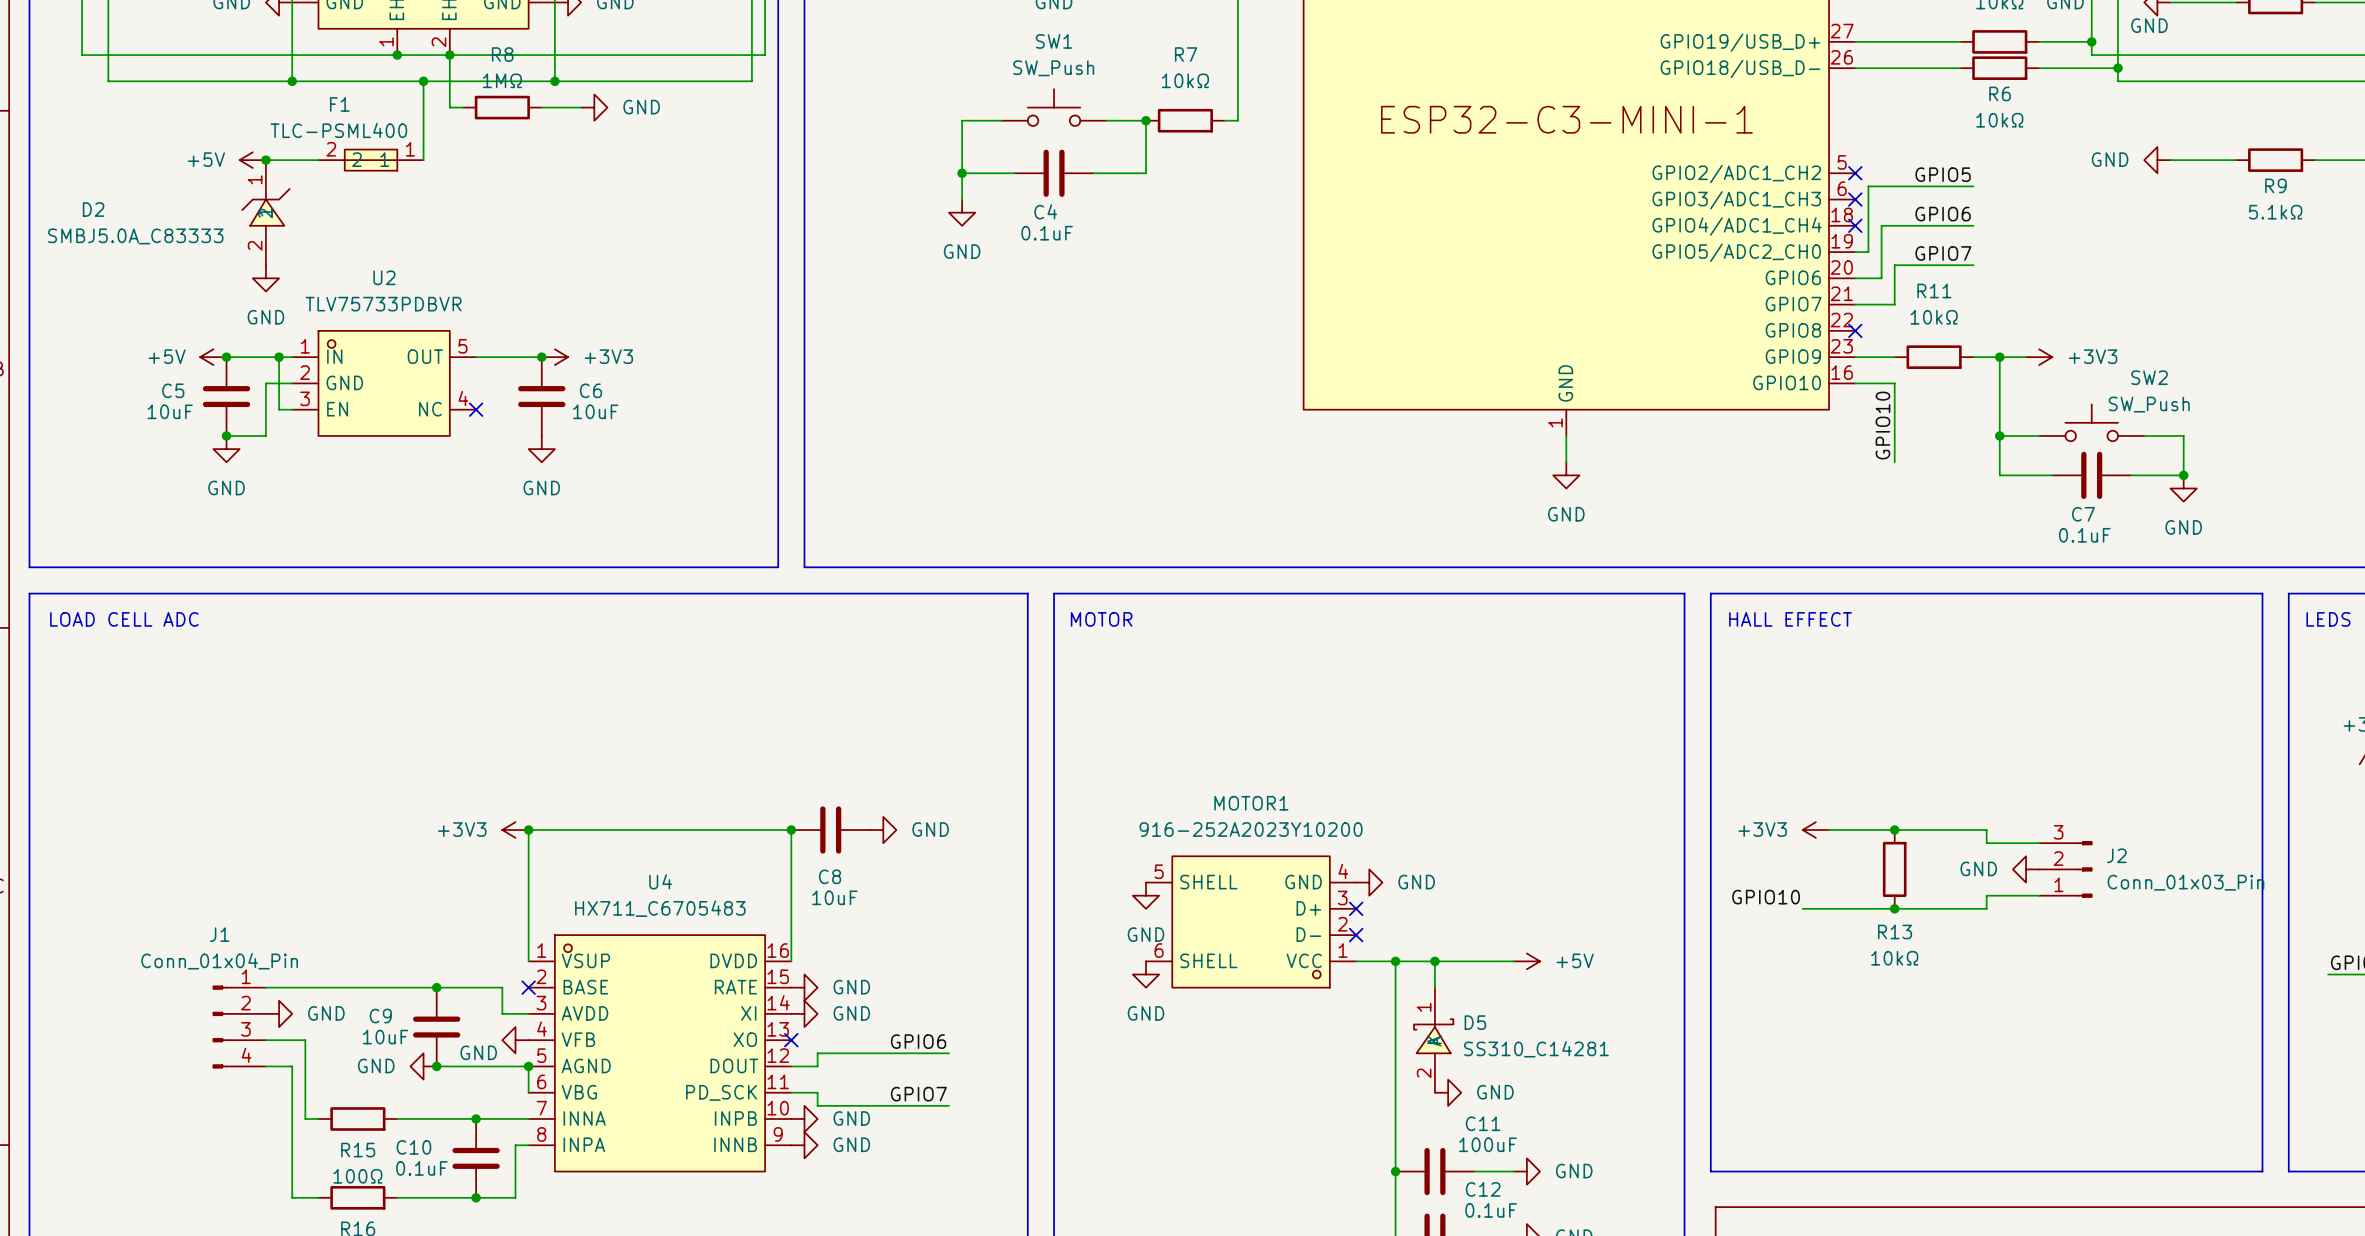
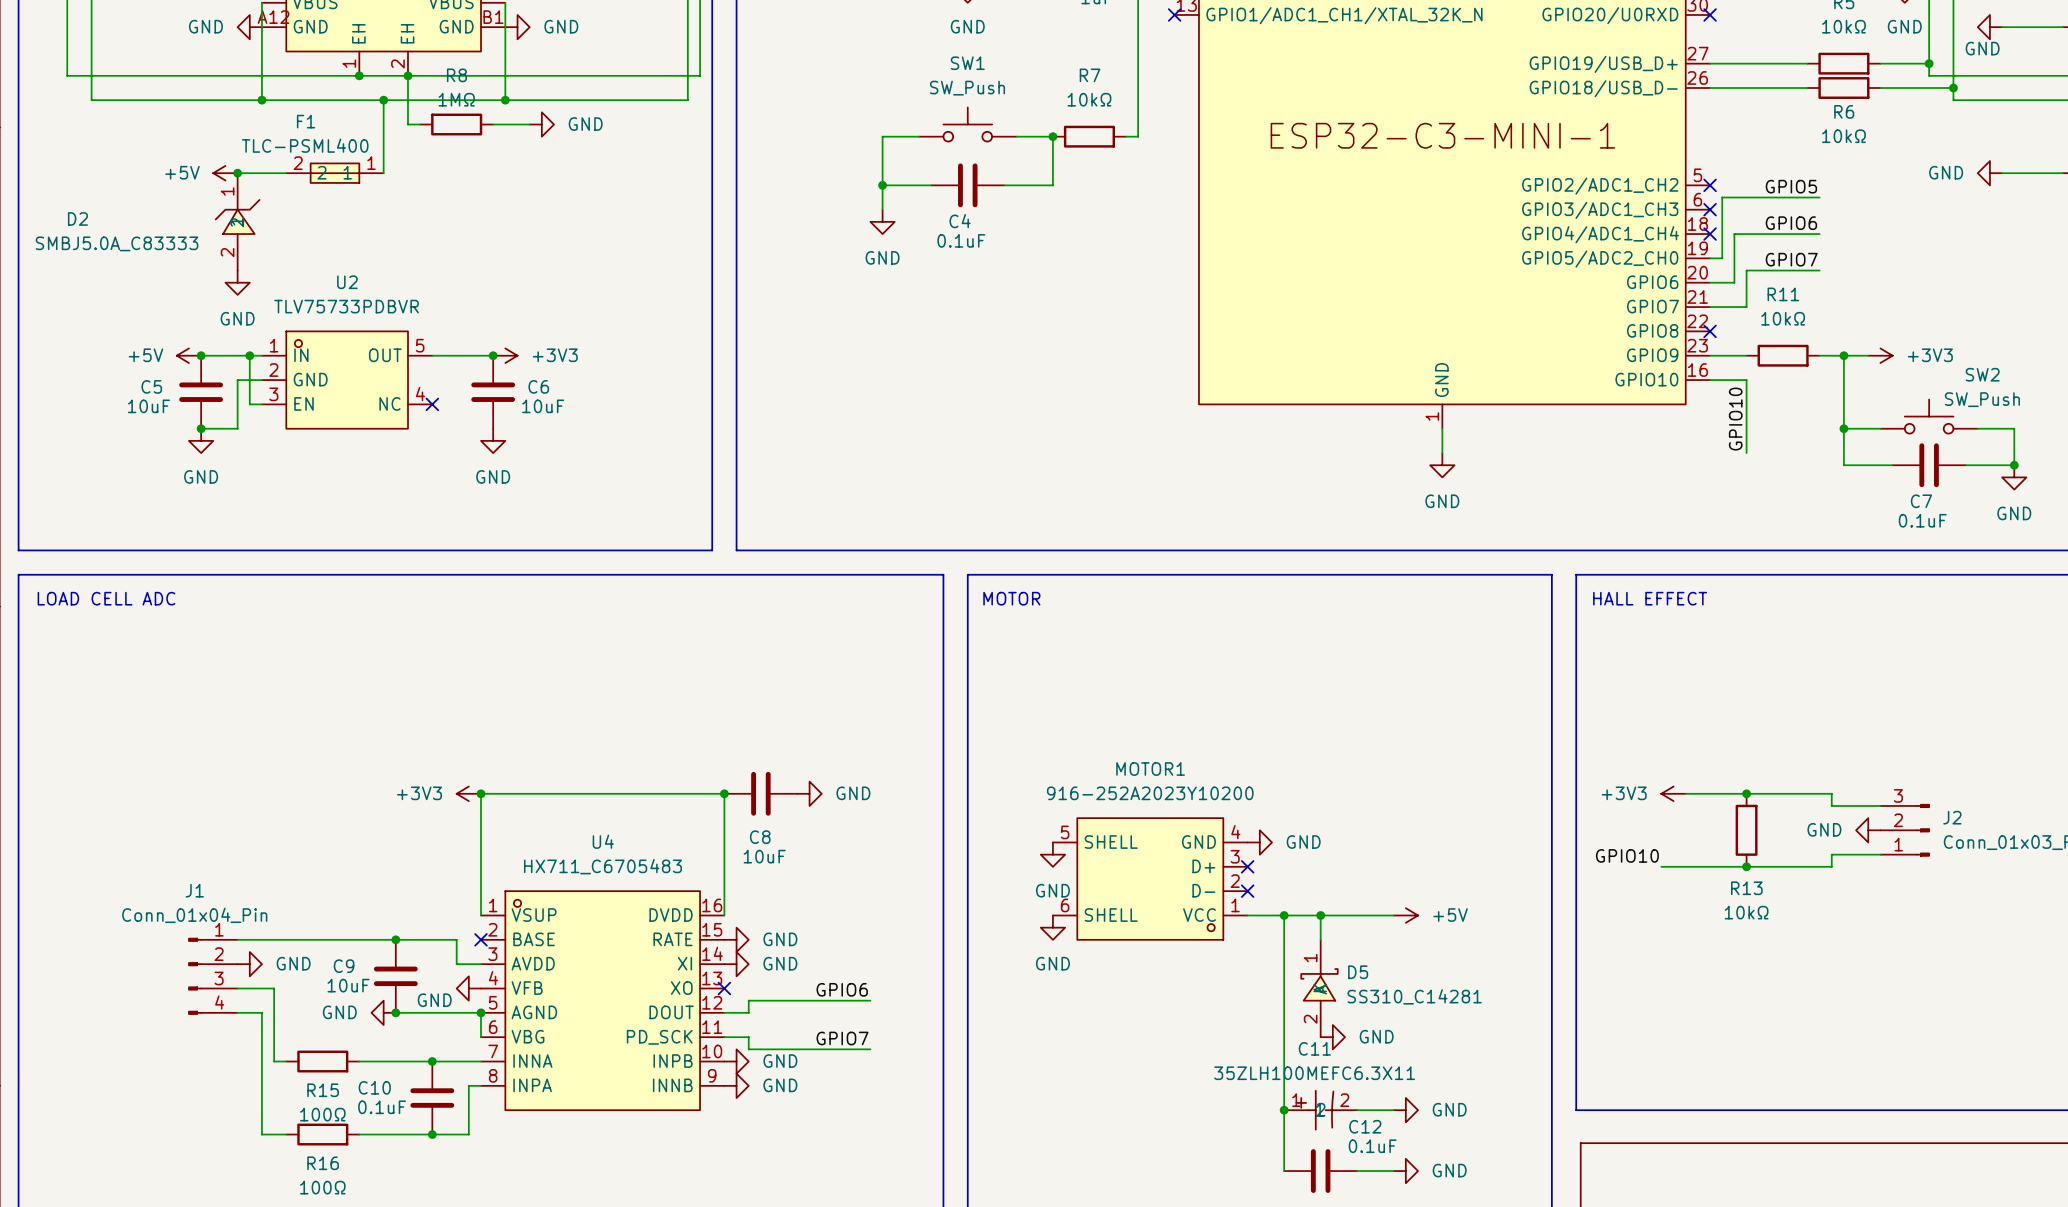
C11 name position: C11 (1483, 1123) -> C11 (1314, 1048)
C11 value: 100uF (1487, 1144) -> 35ZLH100MEFC6.3X11 (1314, 1073)
C11 symbol: [1395, 1147, 1475, 1196] -> [1284, 1090, 1358, 1130]

